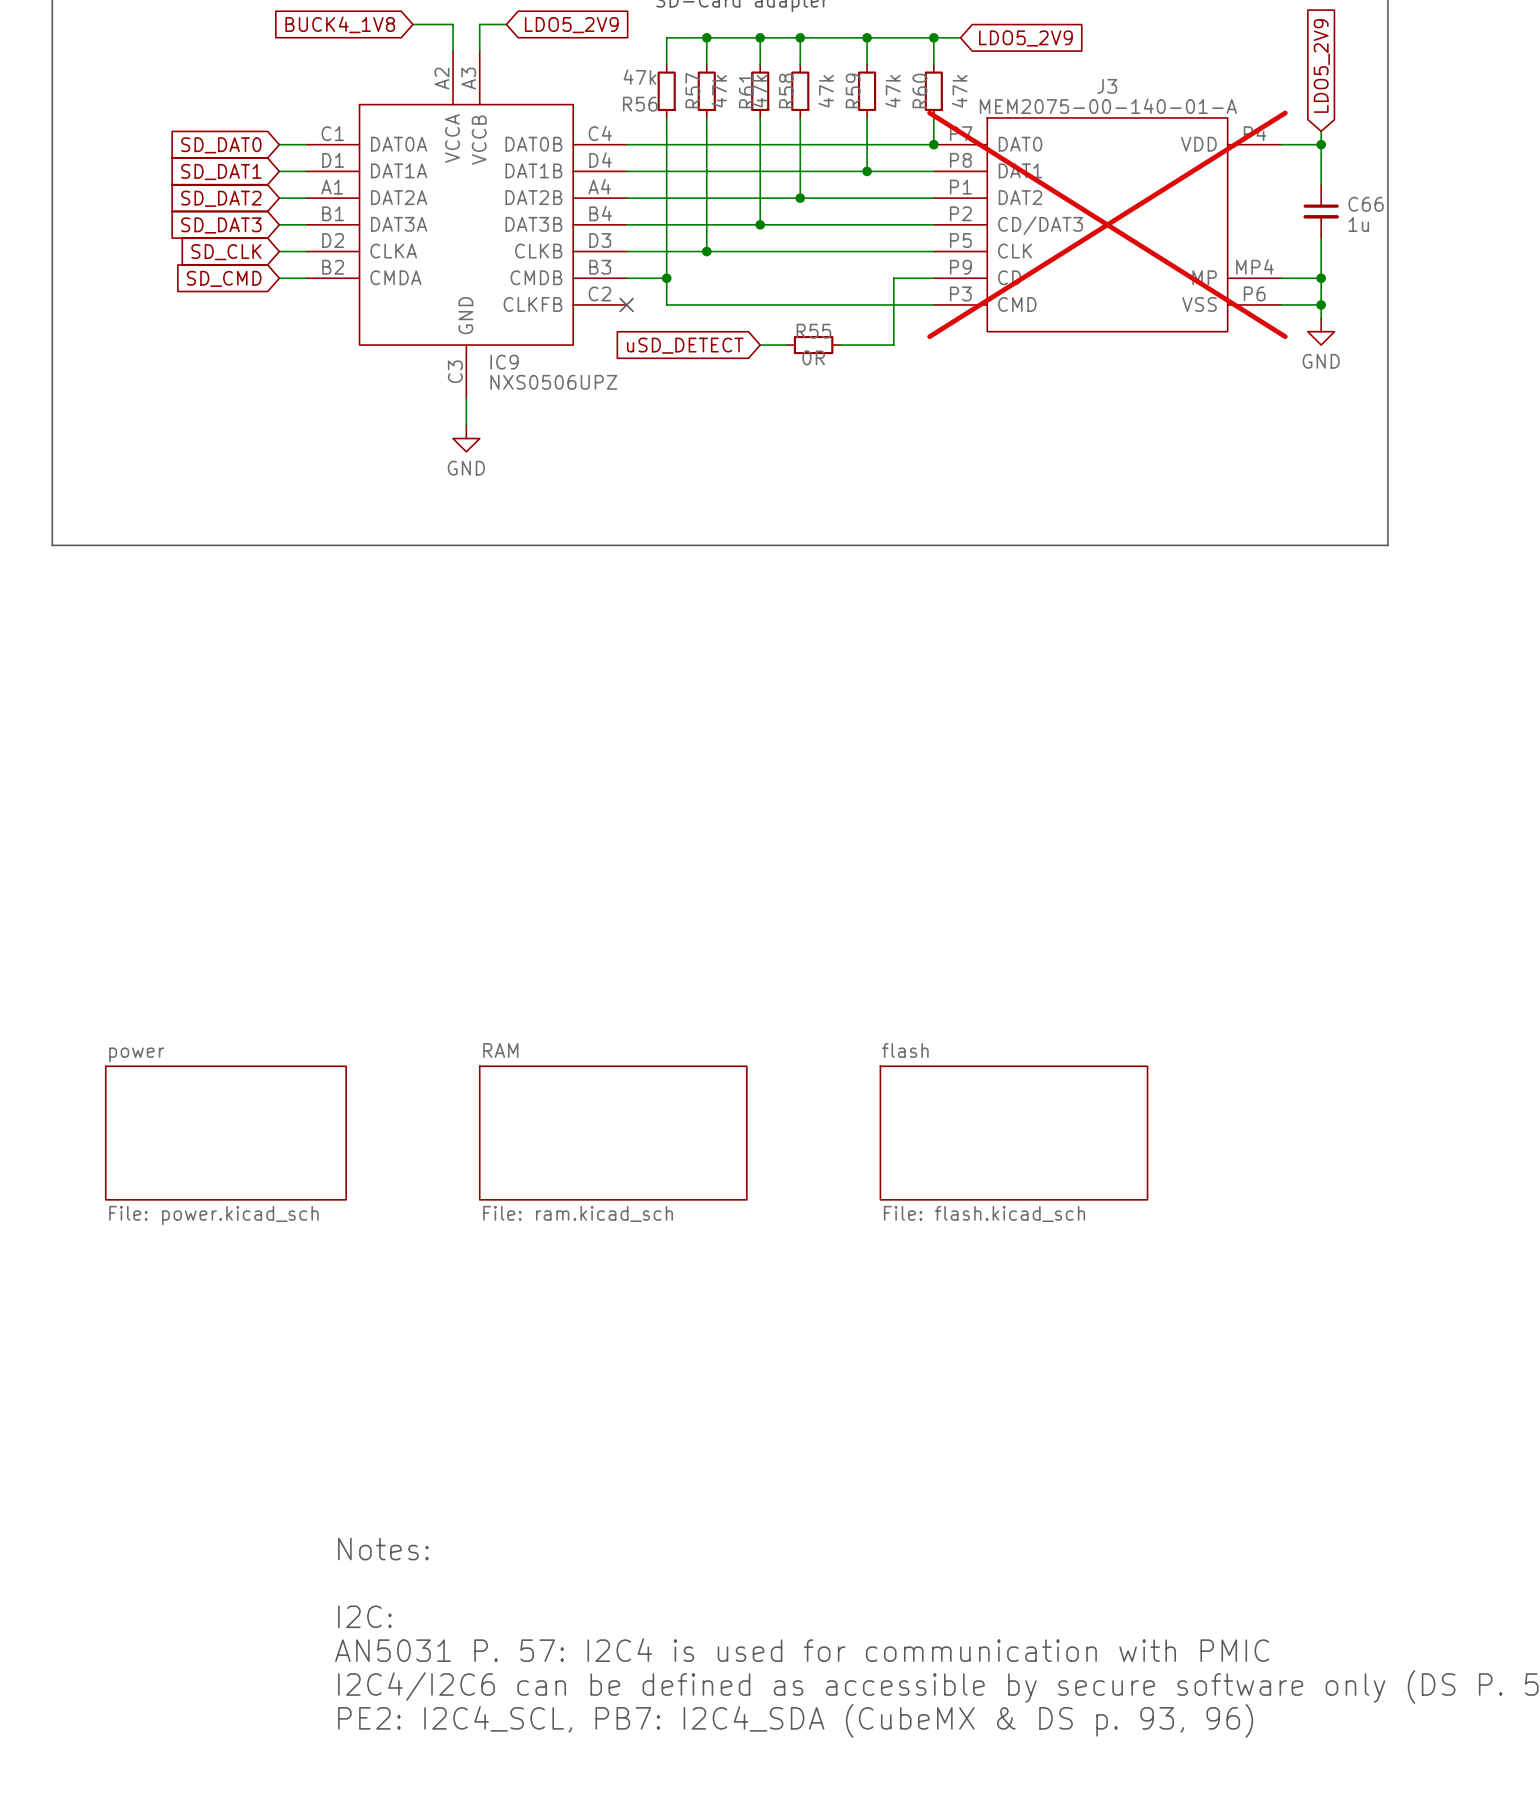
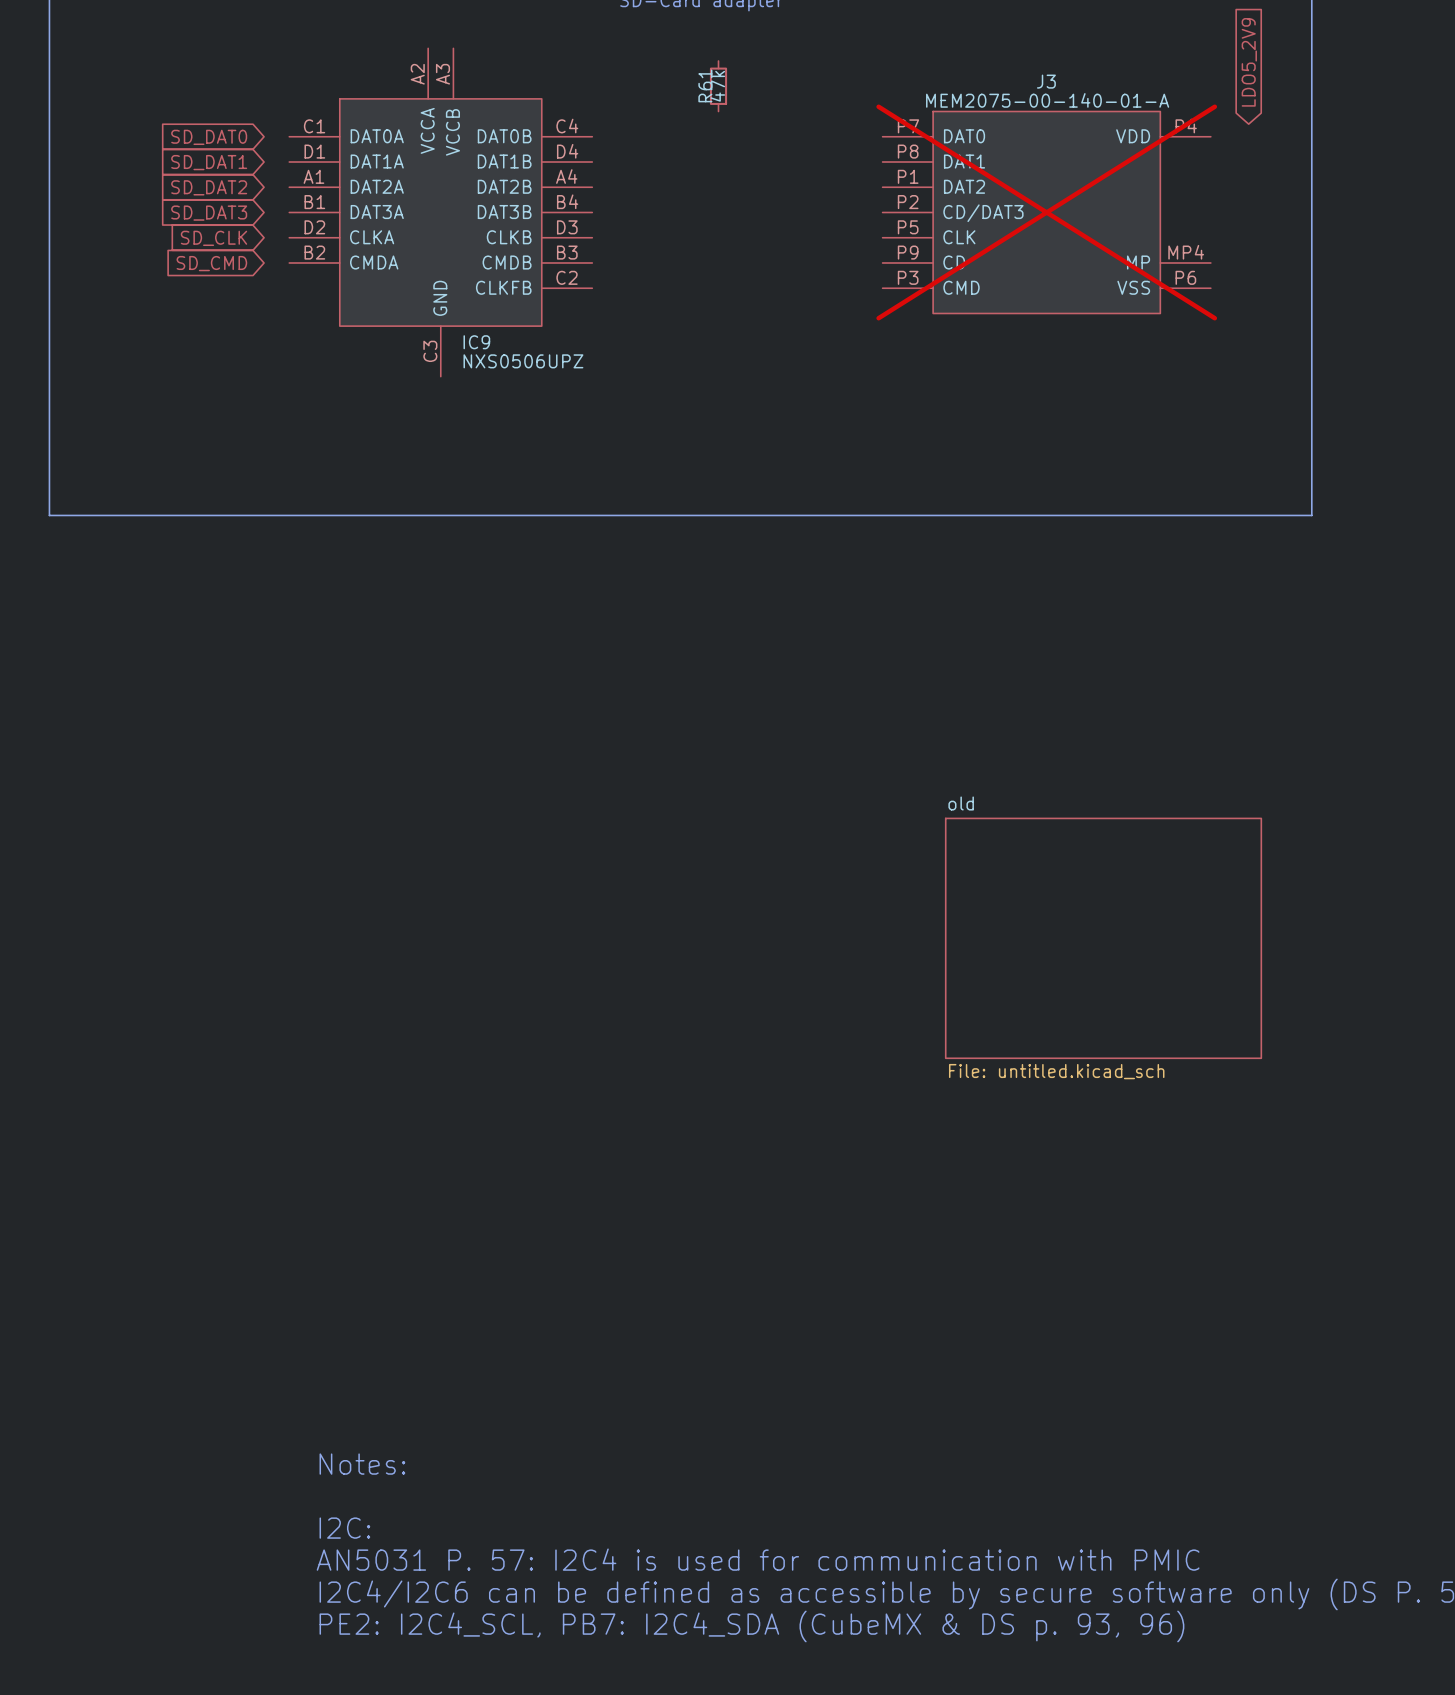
global label: BUCK4_1V8 (340, 24) -> none
wire: (412, 24) (453, 24) (453, 51) -> none
wire: (506, 24) (479, 24) (479, 51) -> none
global label: LDO5_2V9 (571, 25) -> none
wire: (706, 37) (706, 64) -> none
junction: (706, 37) -> none
wire: (760, 37) (760, 64) -> none
junction: (760, 37) -> none
wire: (800, 37) (800, 64) -> none
junction: (800, 37) -> none
wire: (867, 37) (867, 64) -> none
junction: (867, 37) -> none
wire: (933, 37) (933, 64) -> none
junction: (933, 37) -> none
wire: (960, 37) (666, 37) (666, 64) -> none
global label: LDO5_2V9 (1025, 38) -> none
R56: 47k (666, 91) -> none
R57: 47k (706, 91) -> none
R58: 47k (800, 91) -> none
R59: 47k (867, 91) -> none
R60: 47k (933, 91) -> none
wire: (666, 117) (666, 304) (933, 304) -> none
wire: (706, 117) (706, 251) -> none
wire: (760, 117) (760, 224) -> none
wire: (800, 117) (800, 198) -> none
wire: (867, 117) (867, 171) -> none
wire: (933, 117) (933, 144) (626, 144) -> none
wire: (1321, 131) (1321, 184) -> none
wire: (279, 144) (306, 144) -> none
junction: (933, 144) -> none
wire: (1281, 144) (1321, 144) -> none
junction: (1321, 144) -> none
wire: (279, 171) (306, 171) -> none
wire: (626, 171) (933, 171) -> none
junction: (867, 171) -> none
wire: (279, 198) (306, 198) -> none
wire: (626, 198) (933, 198) -> none
junction: (800, 198) -> none
C66: 1u (1321, 211) -> none
wire: (279, 224) (306, 224) -> none
wire: (626, 224) (933, 224) -> none
junction: (760, 224) -> none
wire: (1321, 238) (1321, 318) -> none
wire: (279, 251) (306, 251) -> none
wire: (626, 251) (933, 251) -> none
junction: (706, 251) -> none
wire: (279, 278) (306, 278) -> none
wire: (626, 278) (666, 278) -> none
junction: (666, 278) -> none
wire: (933, 278) (893, 278) (893, 345) (840, 345) -> none
wire: (1281, 278) (1321, 278) -> none
junction: (1321, 278) -> none
no-connect mark: (626, 304) -> none
wire: (1281, 304) (1321, 304) -> none
junction: (1321, 304) -> none
power symbol: GND (1321, 331) -> none
global label: uSD_DETECT (685, 345) -> none
wire: (760, 345) (786, 345) -> none
R55: 0R (813, 345) -> none
wire: (466, 398) (466, 425) -> none
power symbol: GND (466, 438) -> none
sheet old: none -> File: untitled.kicad_sch (1103, 938)
sheet power: File: power.kicad_sch (225, 1133) -> none
sheet RAM: File: ram.kicad_sch (613, 1133) -> none
sheet flash: File: flash.kicad_sch (1013, 1133) -> none

